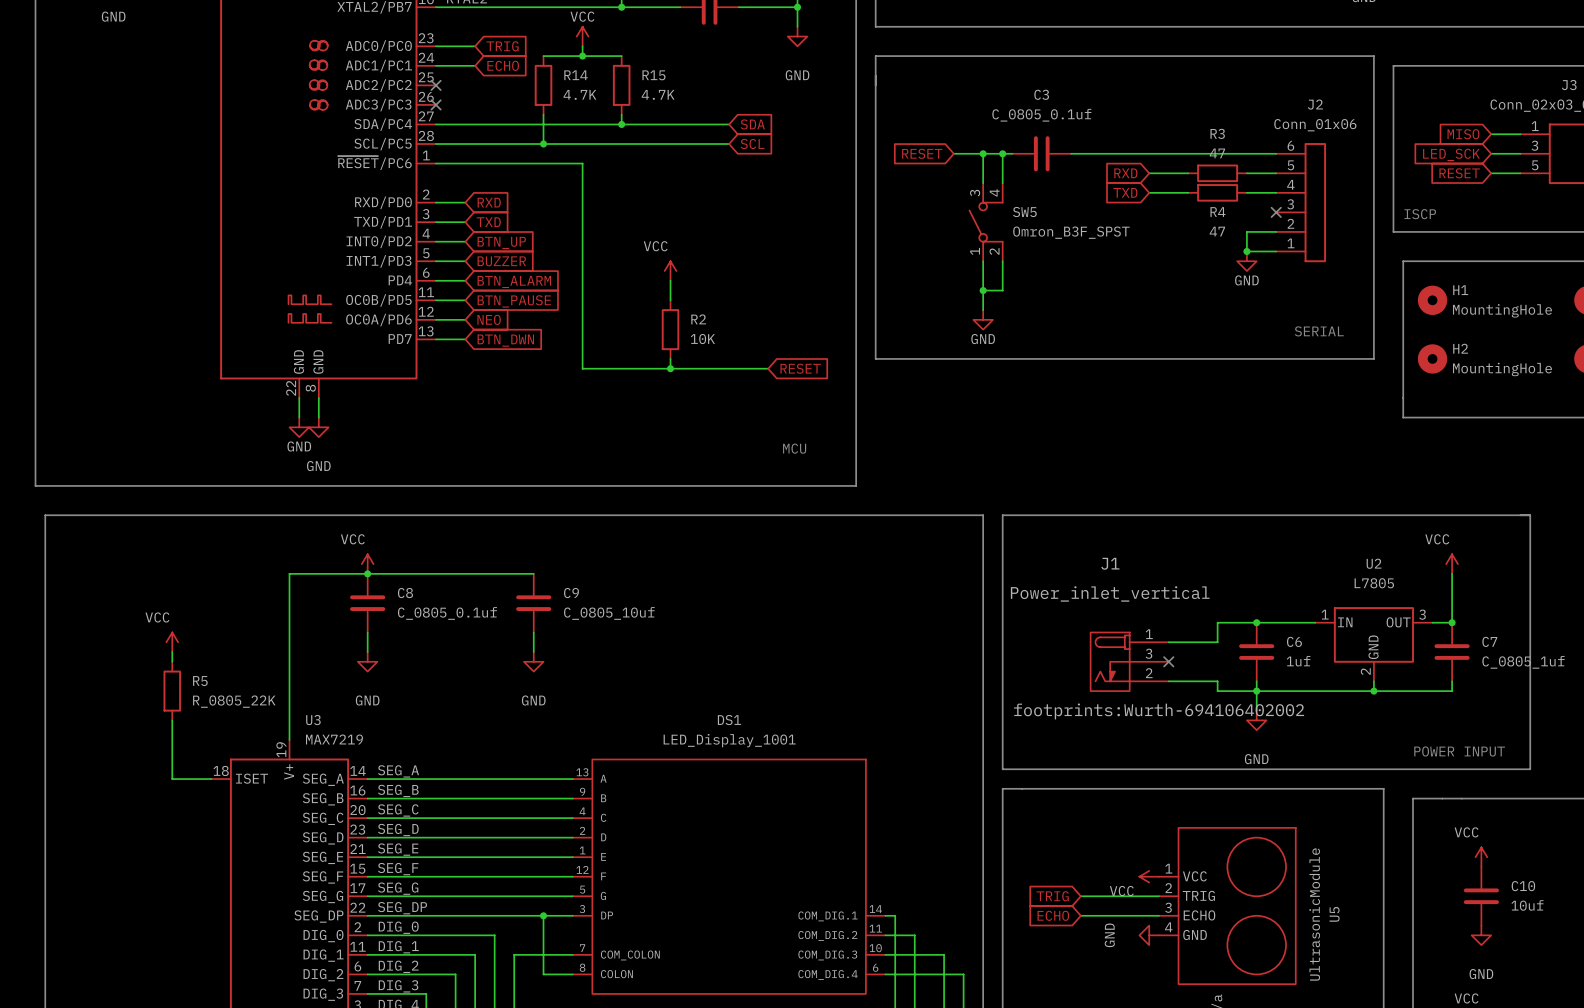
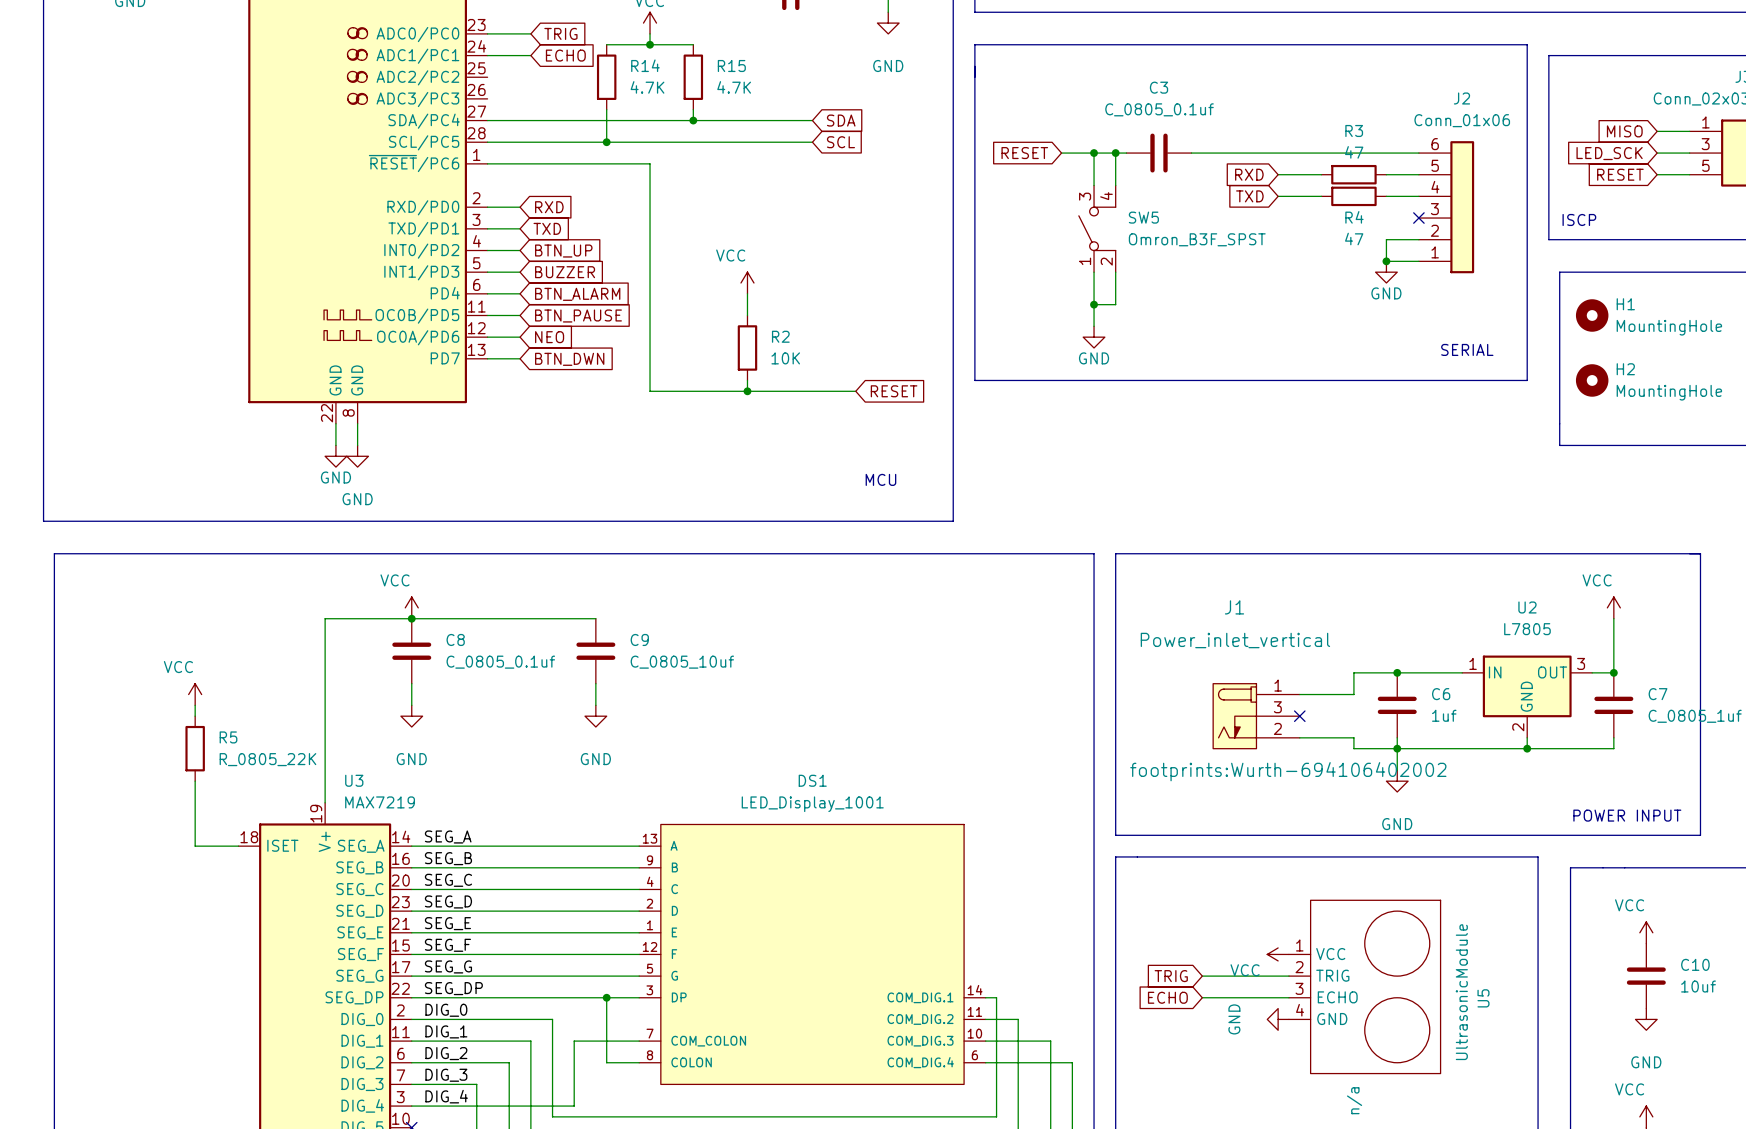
no-connect mark: (436, 85) -> none
no-connect mark: (436, 104) -> none

